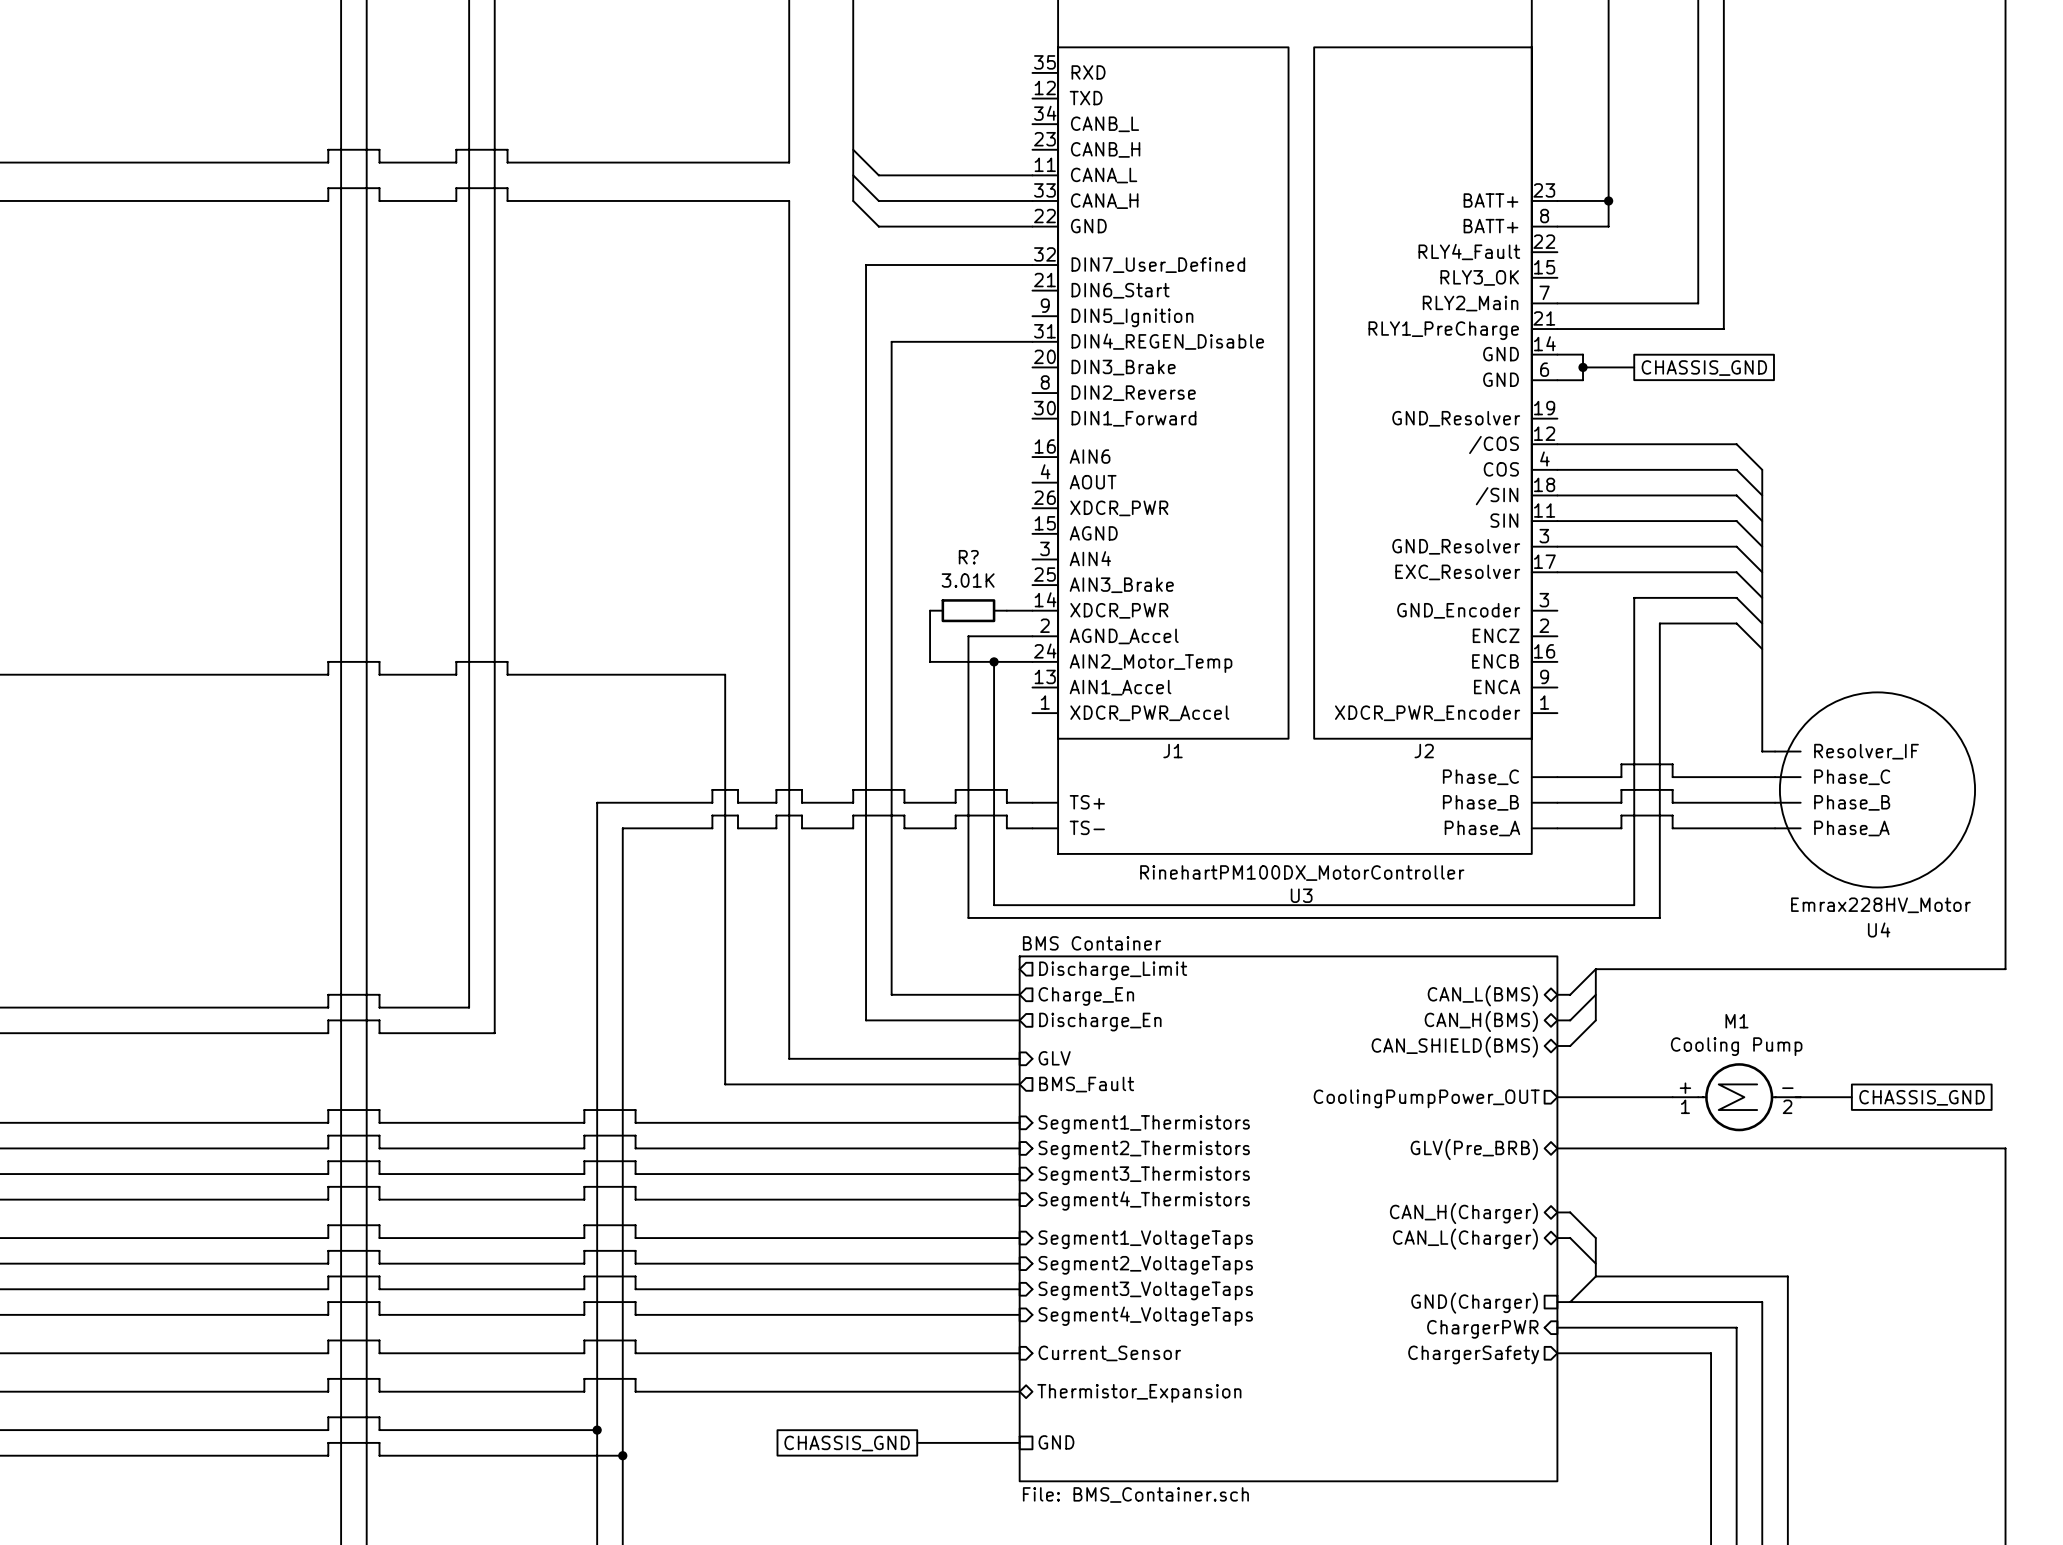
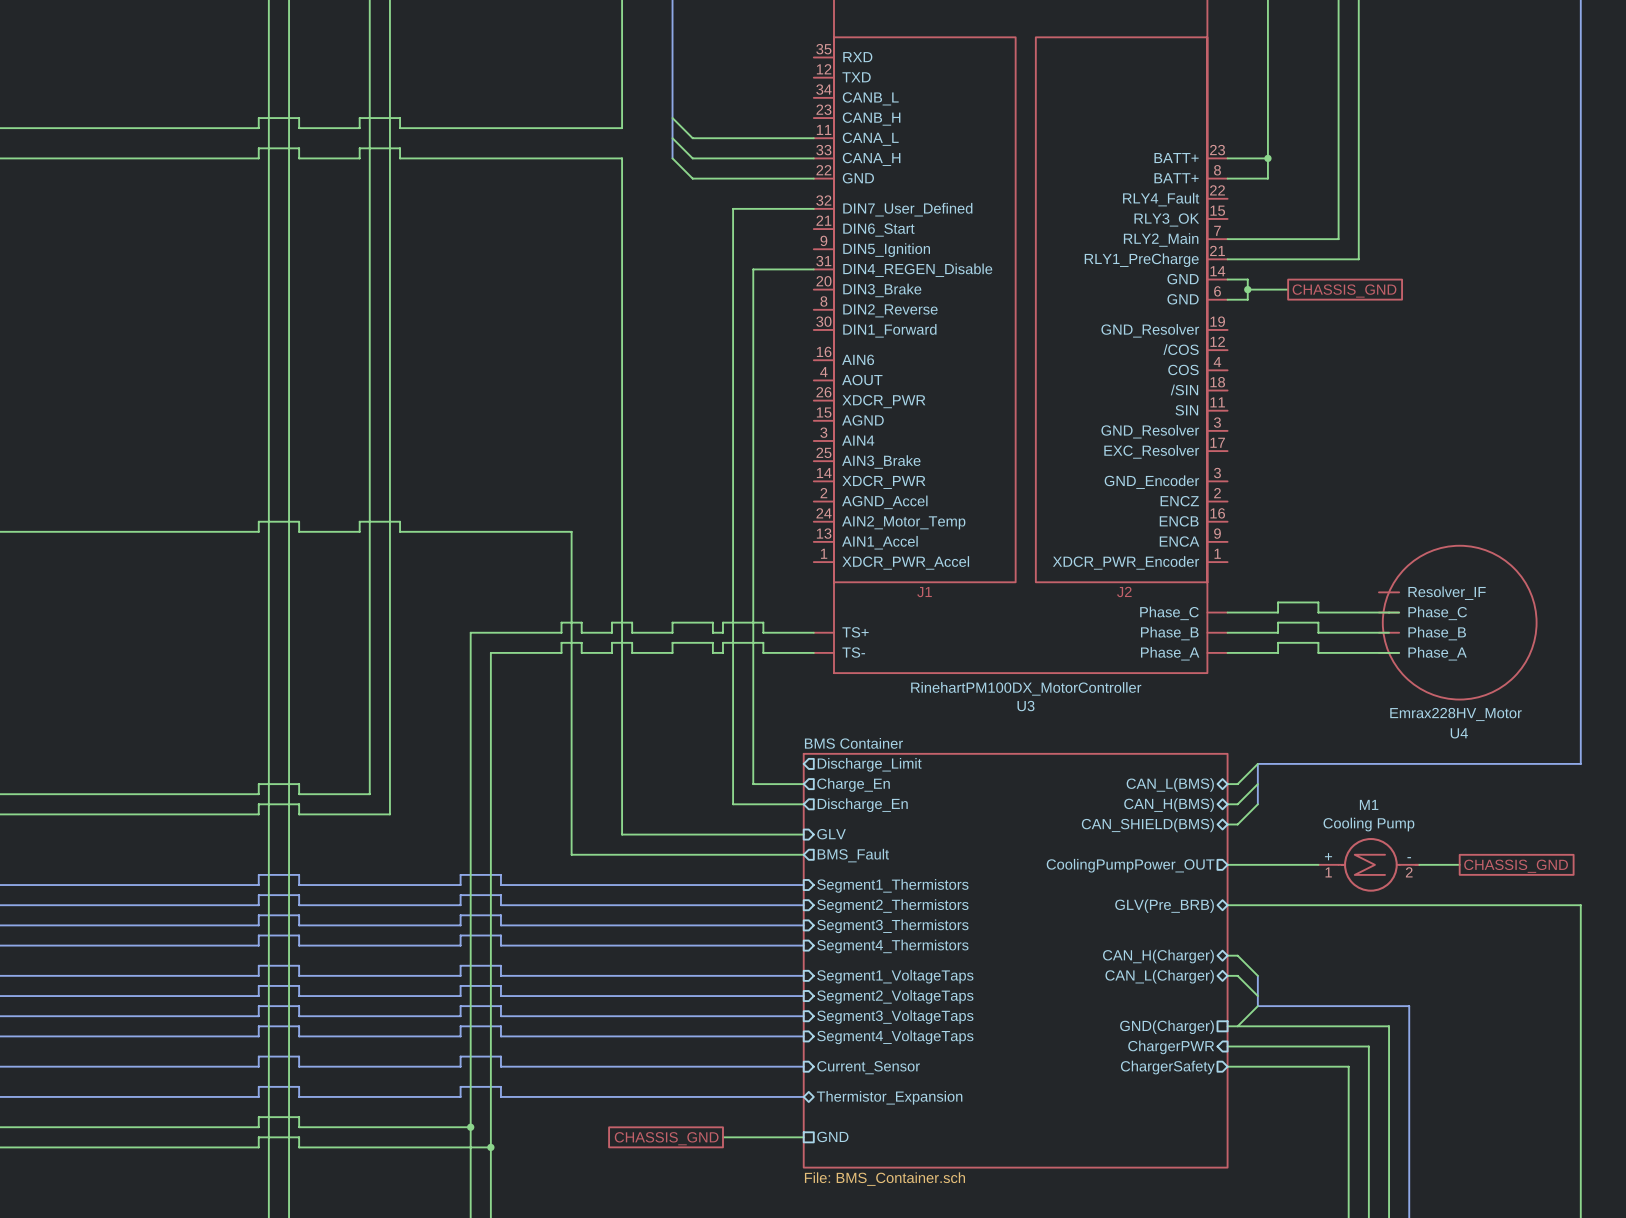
wire: (930, 265) (866, 265) (866, 1020) (930, 1020) -> (733, 208) (733, 481)
wire: (955, 341) (891, 341) (891, 994) (955, 994) -> (753, 269) (753, 622) (722, 622) (722, 632)
wire: (1557, 444) (1736, 444) (1762, 469) -> none
wire: (1557, 469) (1736, 469) (1762, 495) -> none
bus: (1762, 469) (1762, 751) (1775, 751) -> none
wire: (1557, 495) (1736, 495) (1762, 521) -> none
wire: (1557, 521) (1736, 521) (1762, 546) -> none
wire: (1557, 546) (1736, 546) (1762, 572) -> none
wire: (1557, 572) (1736, 572) (1762, 597) -> none
R?: 3.01K (968, 610) -> none
wire: (1006, 610) (1032, 610) -> none
wire: (1762, 623) (1736, 597) (1634, 597) (1634, 905) (994, 905) (994, 661) -> none
wire: (1032, 636) (968, 636) (968, 789) (1006, 789) (1006, 802) -> none
wire: (1762, 649) (1736, 623) (1659, 623) (1659, 917) (968, 917) (968, 828) -> (793, 652) (763, 652)
wire: (930, 661) (1032, 661) -> (733, 521) (733, 804)
junction: (994, 661) -> none
U4 position: (1875, 789) -> (1457, 622)
wire: (917, 802) (955, 802) -> (722, 652) (722, 642) (753, 642) (753, 632)
wire: (968, 802) (968, 815) (1006, 815) (1006, 828) -> (763, 632) (793, 632)
wire: (917, 828) (955, 828) -> (753, 784) (753, 652)

